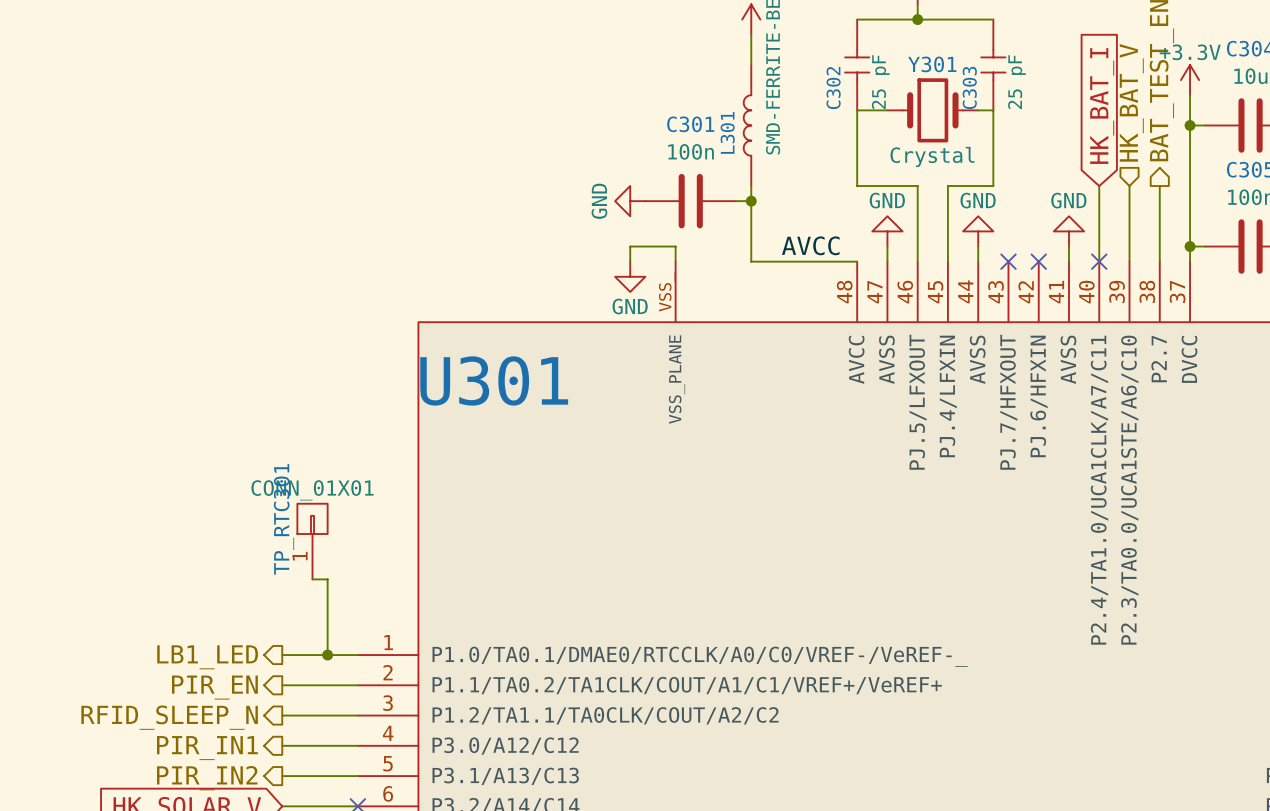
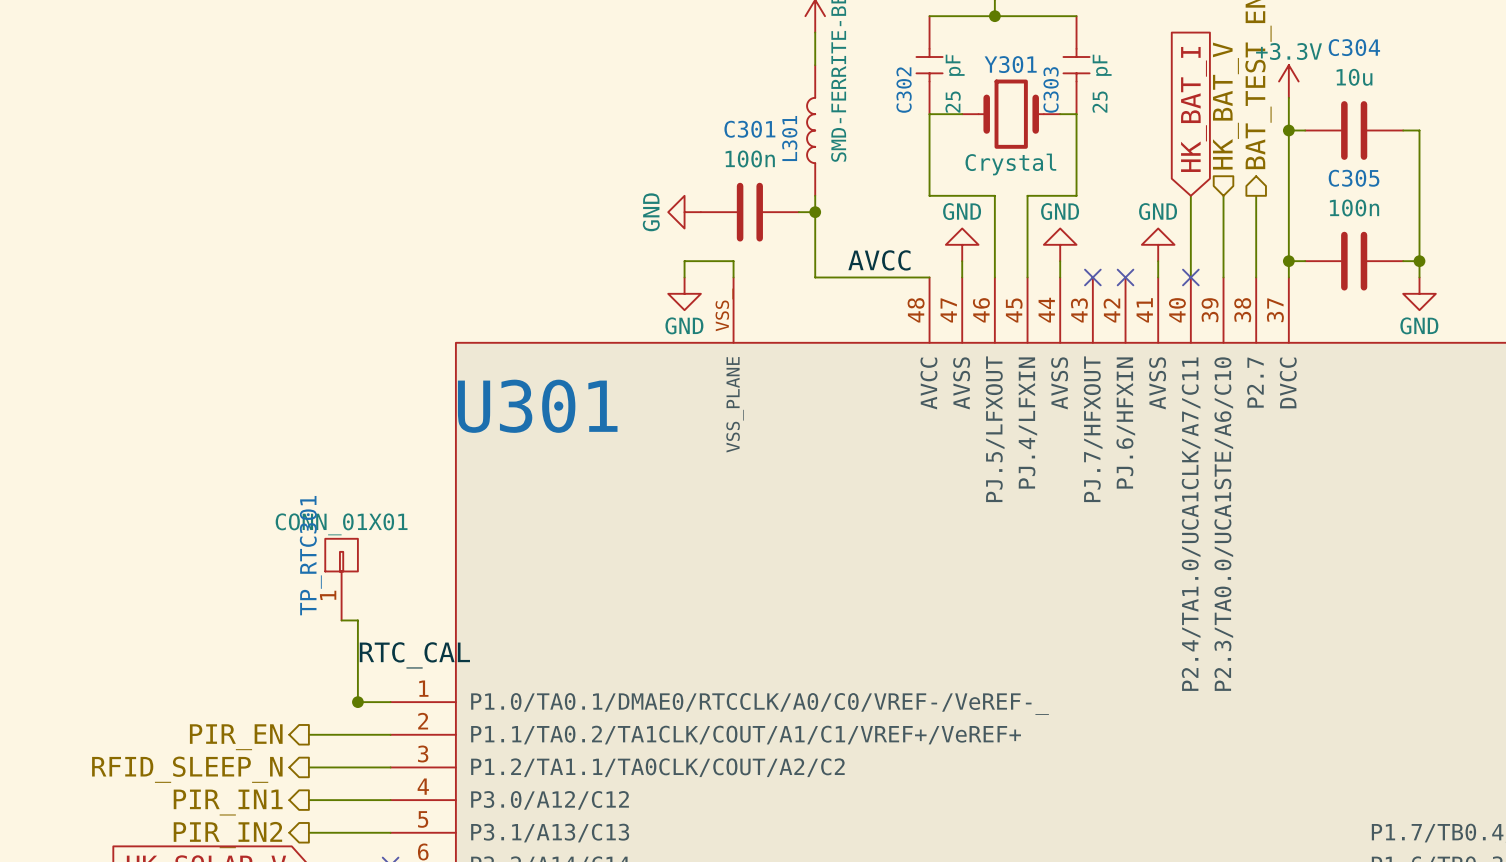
label: none -> RTC_CAL (414, 655)
wire: (282, 655) (327, 655) -> none
hierarchical label: LB1_LED (207, 657) -> none

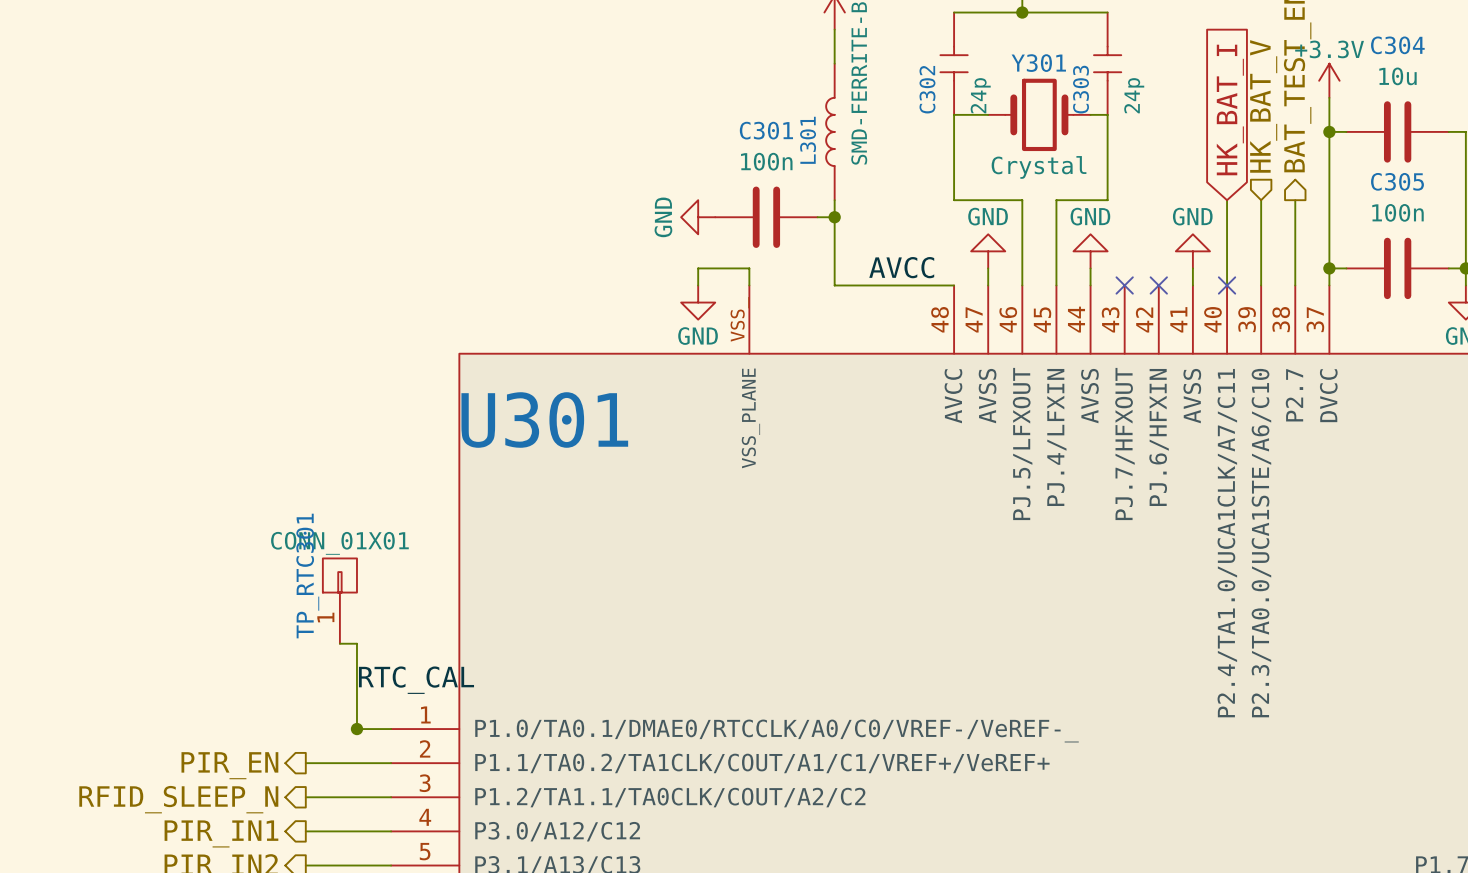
C302 value: 25 pF (955, 83) -> 24p (980, 95)
C303 value: 25 pF (1102, 83) -> 24p (1134, 95)

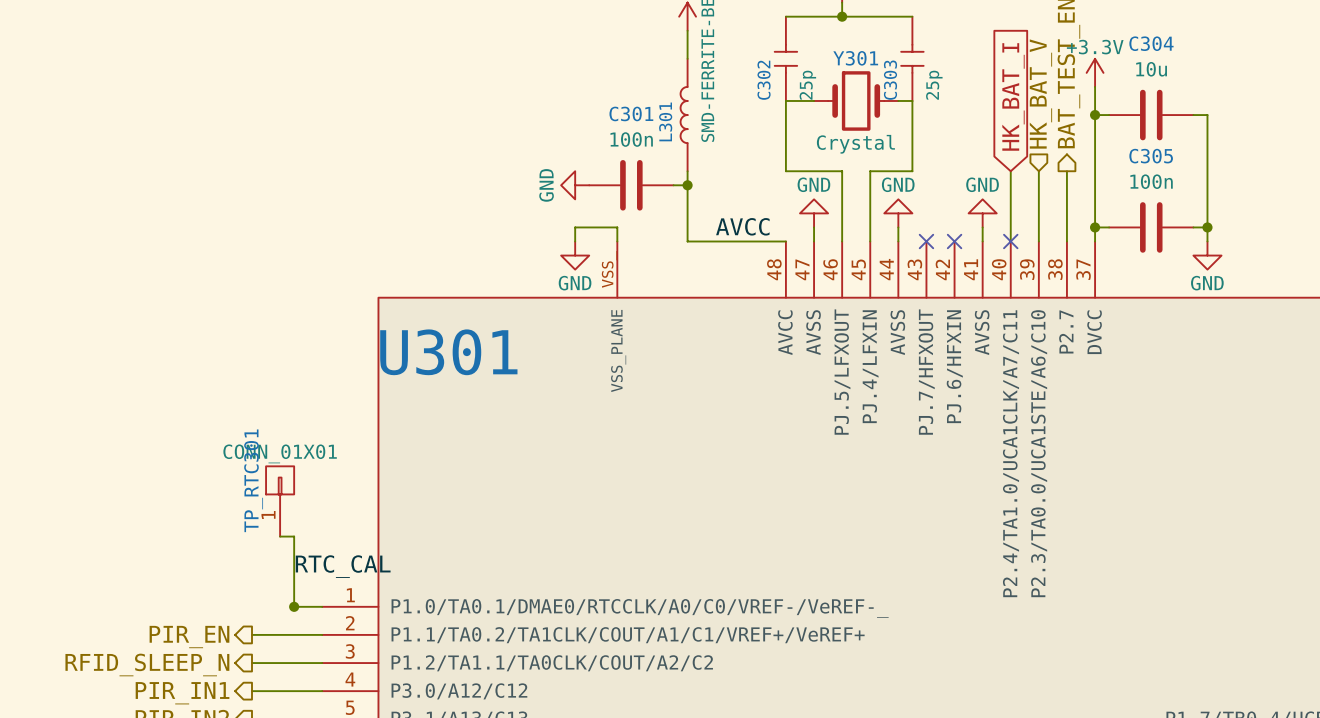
C302 value: 24p (980, 95) -> 25p (807, 85)
C303 value: 24p (1134, 95) -> 25p (934, 85)

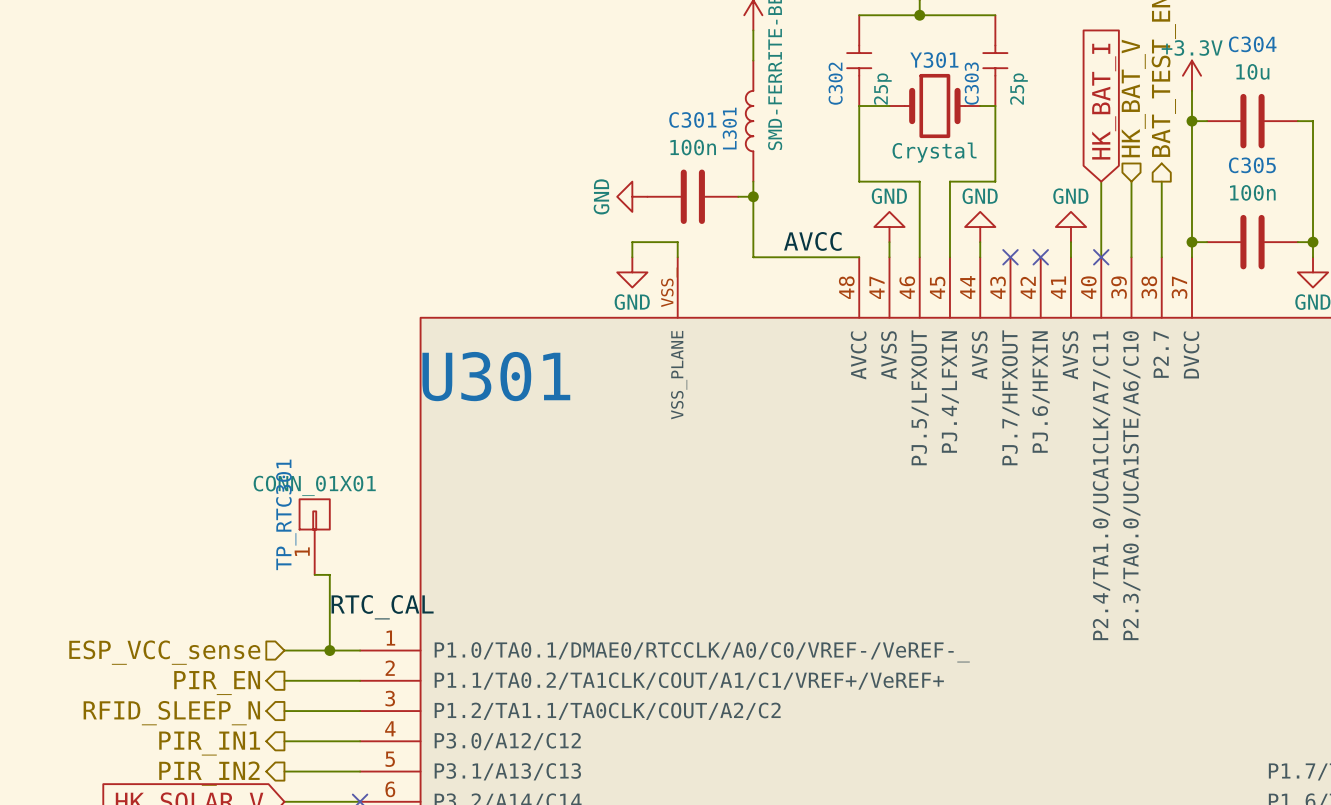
wire: none -> (284, 650) (329, 650)
hierarchical label: none -> ESP_VCC_sense (164, 652)

